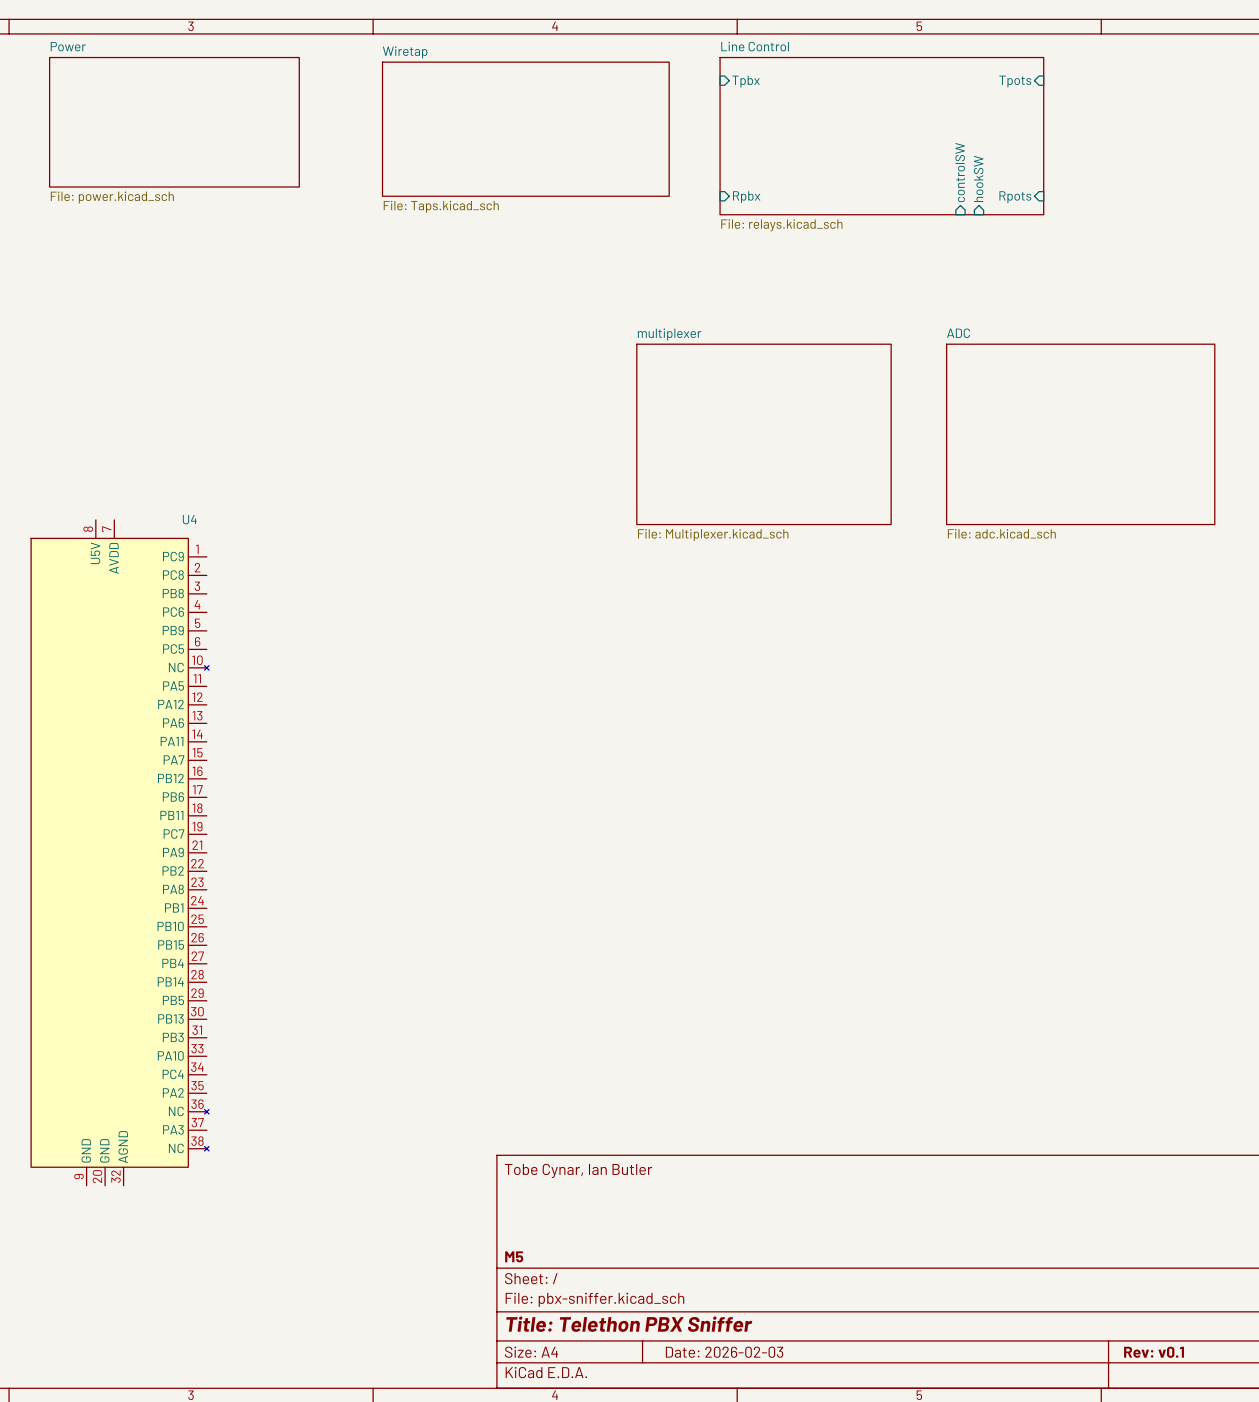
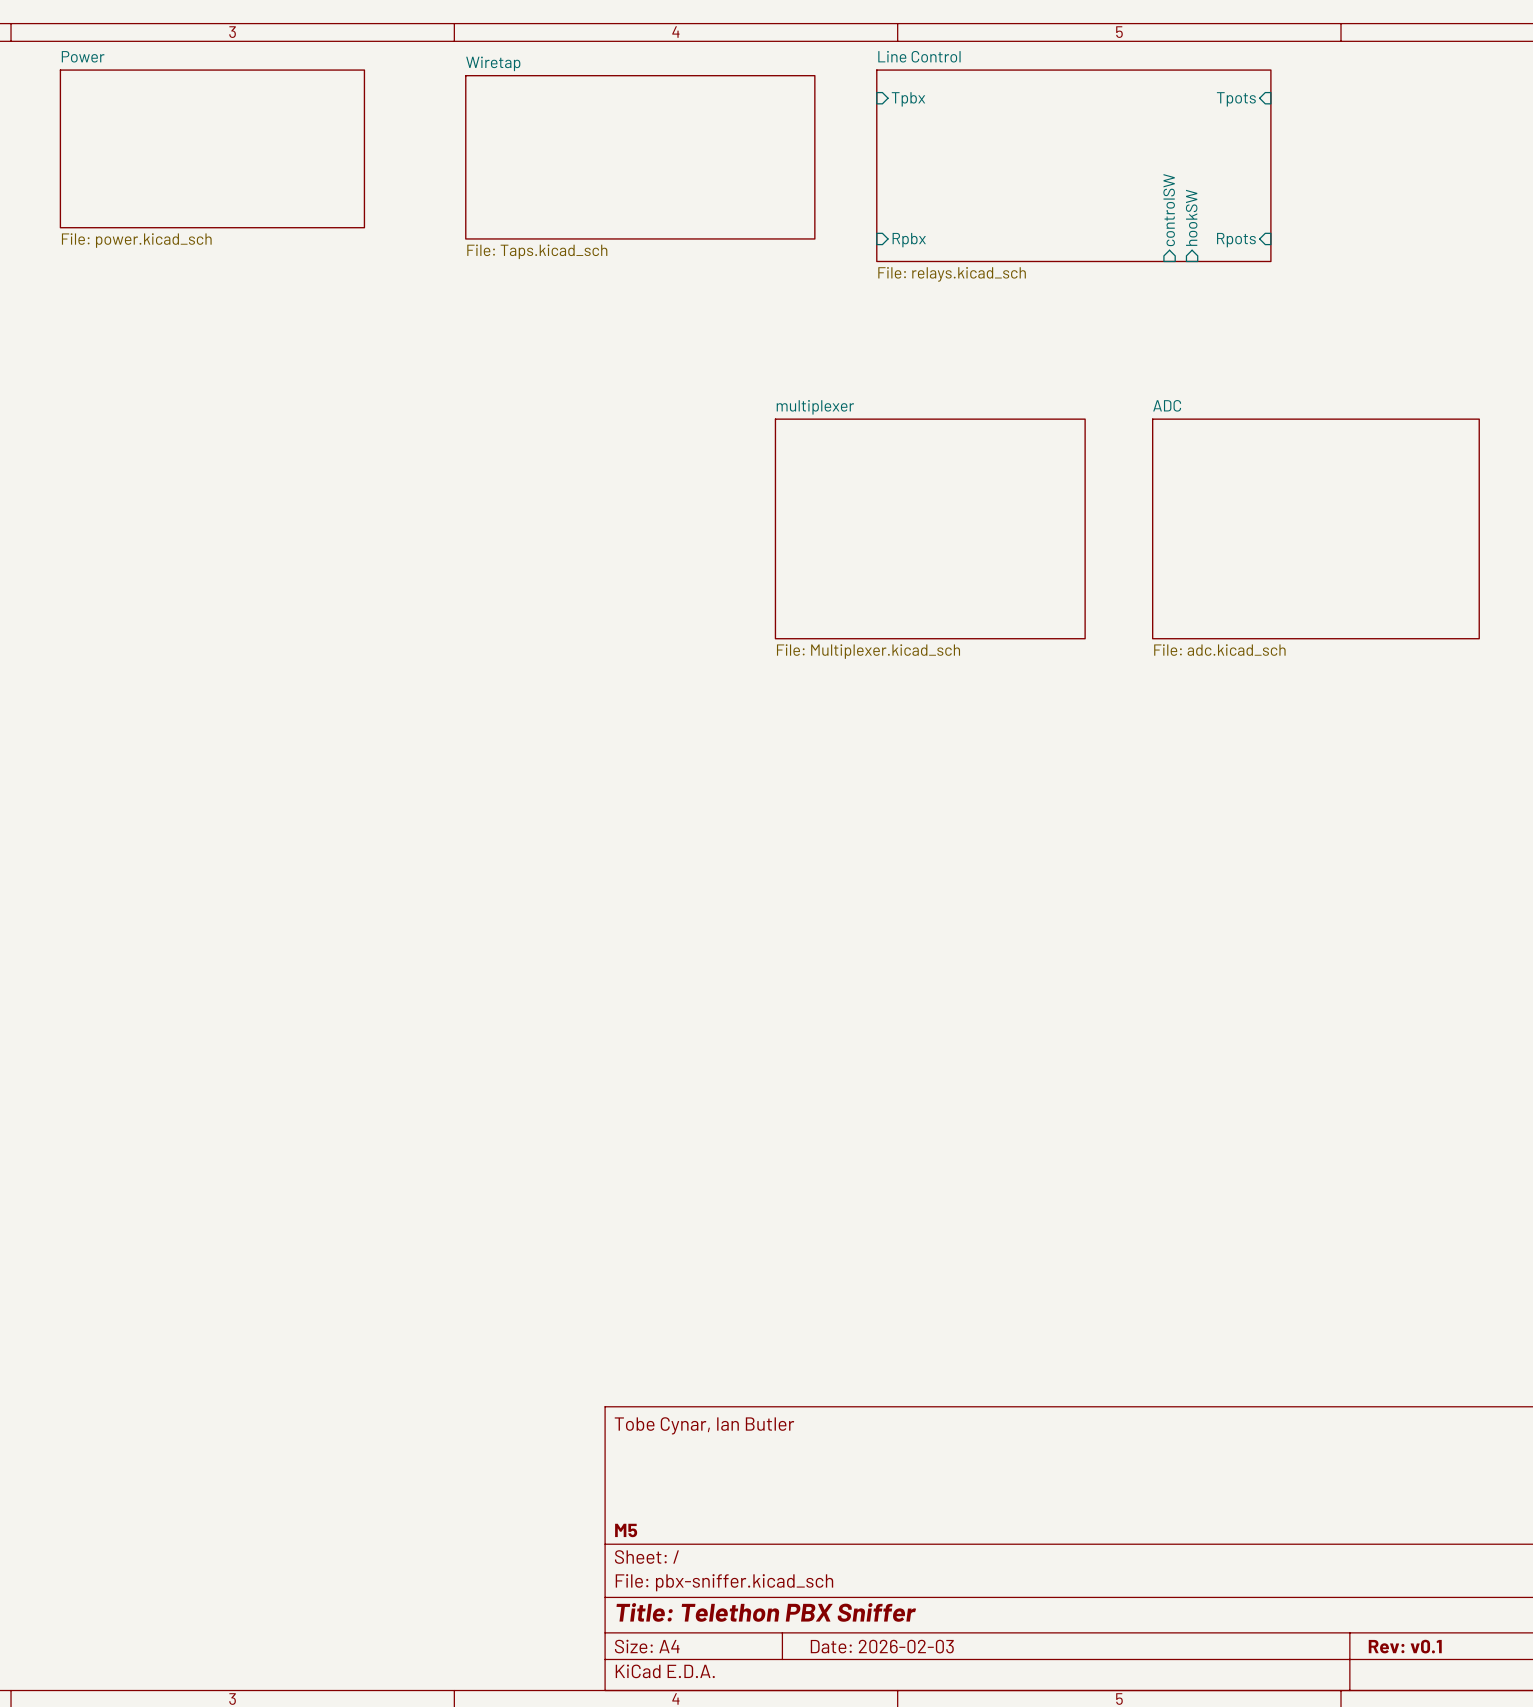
U4: (120, 852) -> none

